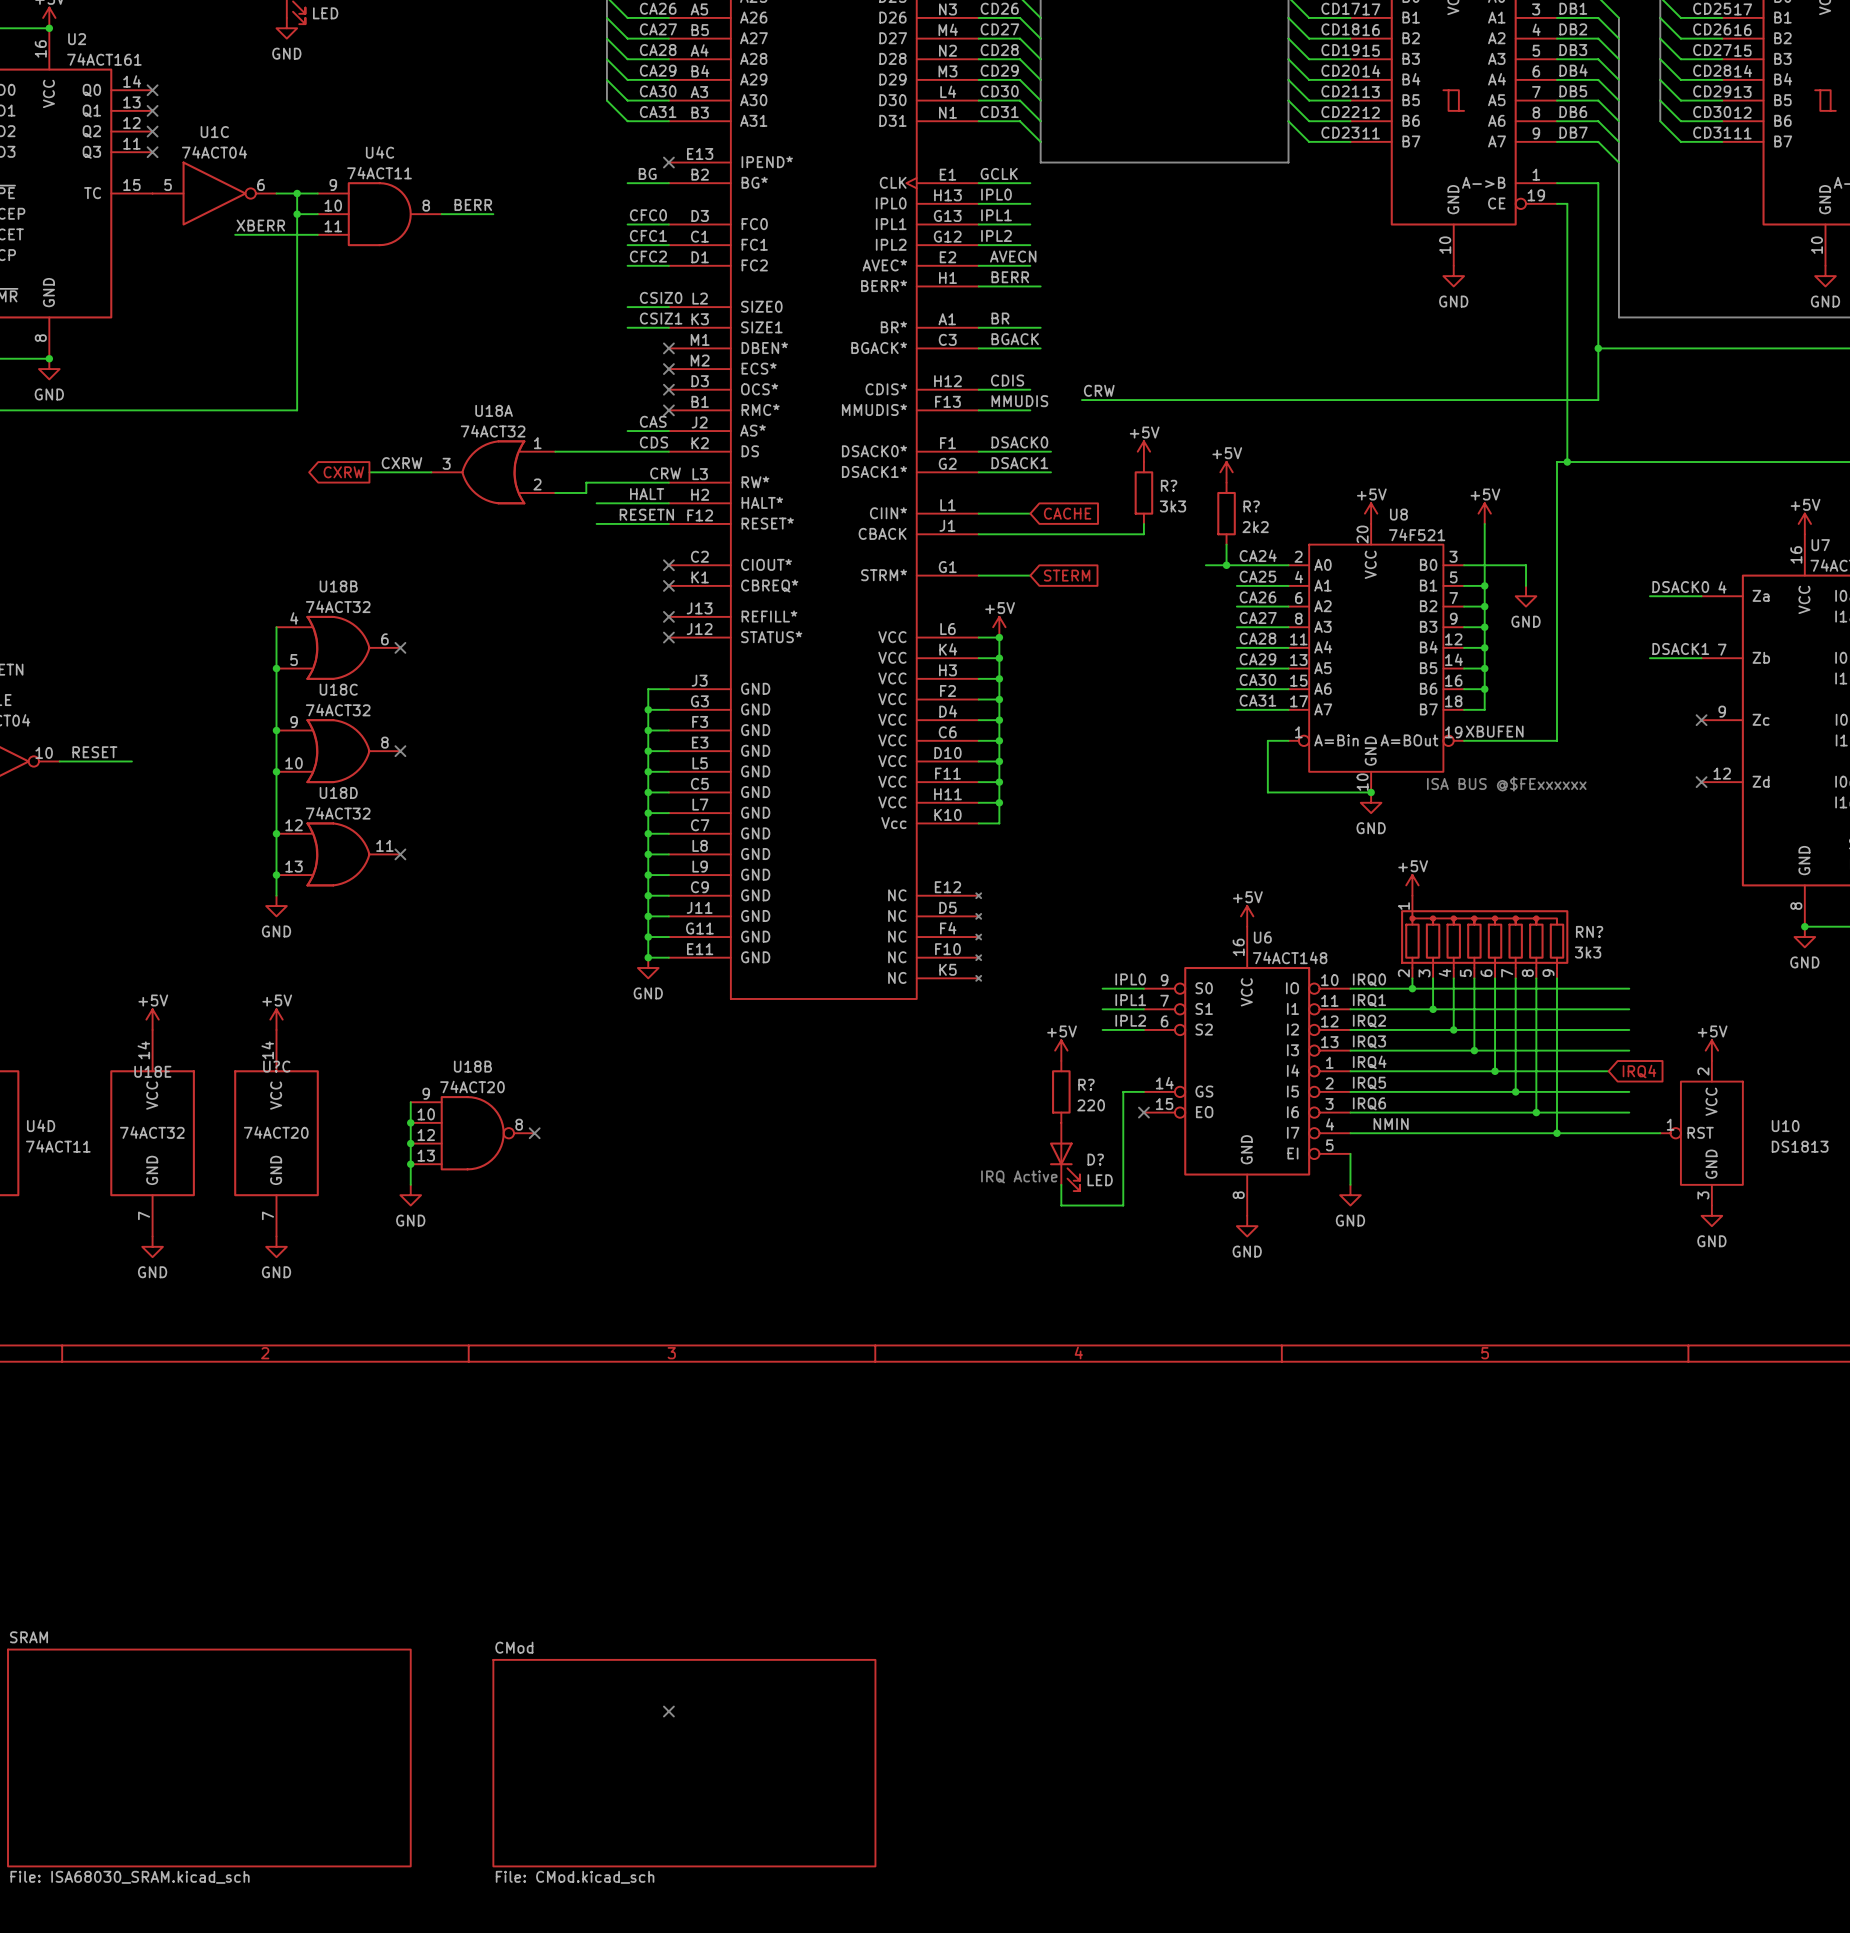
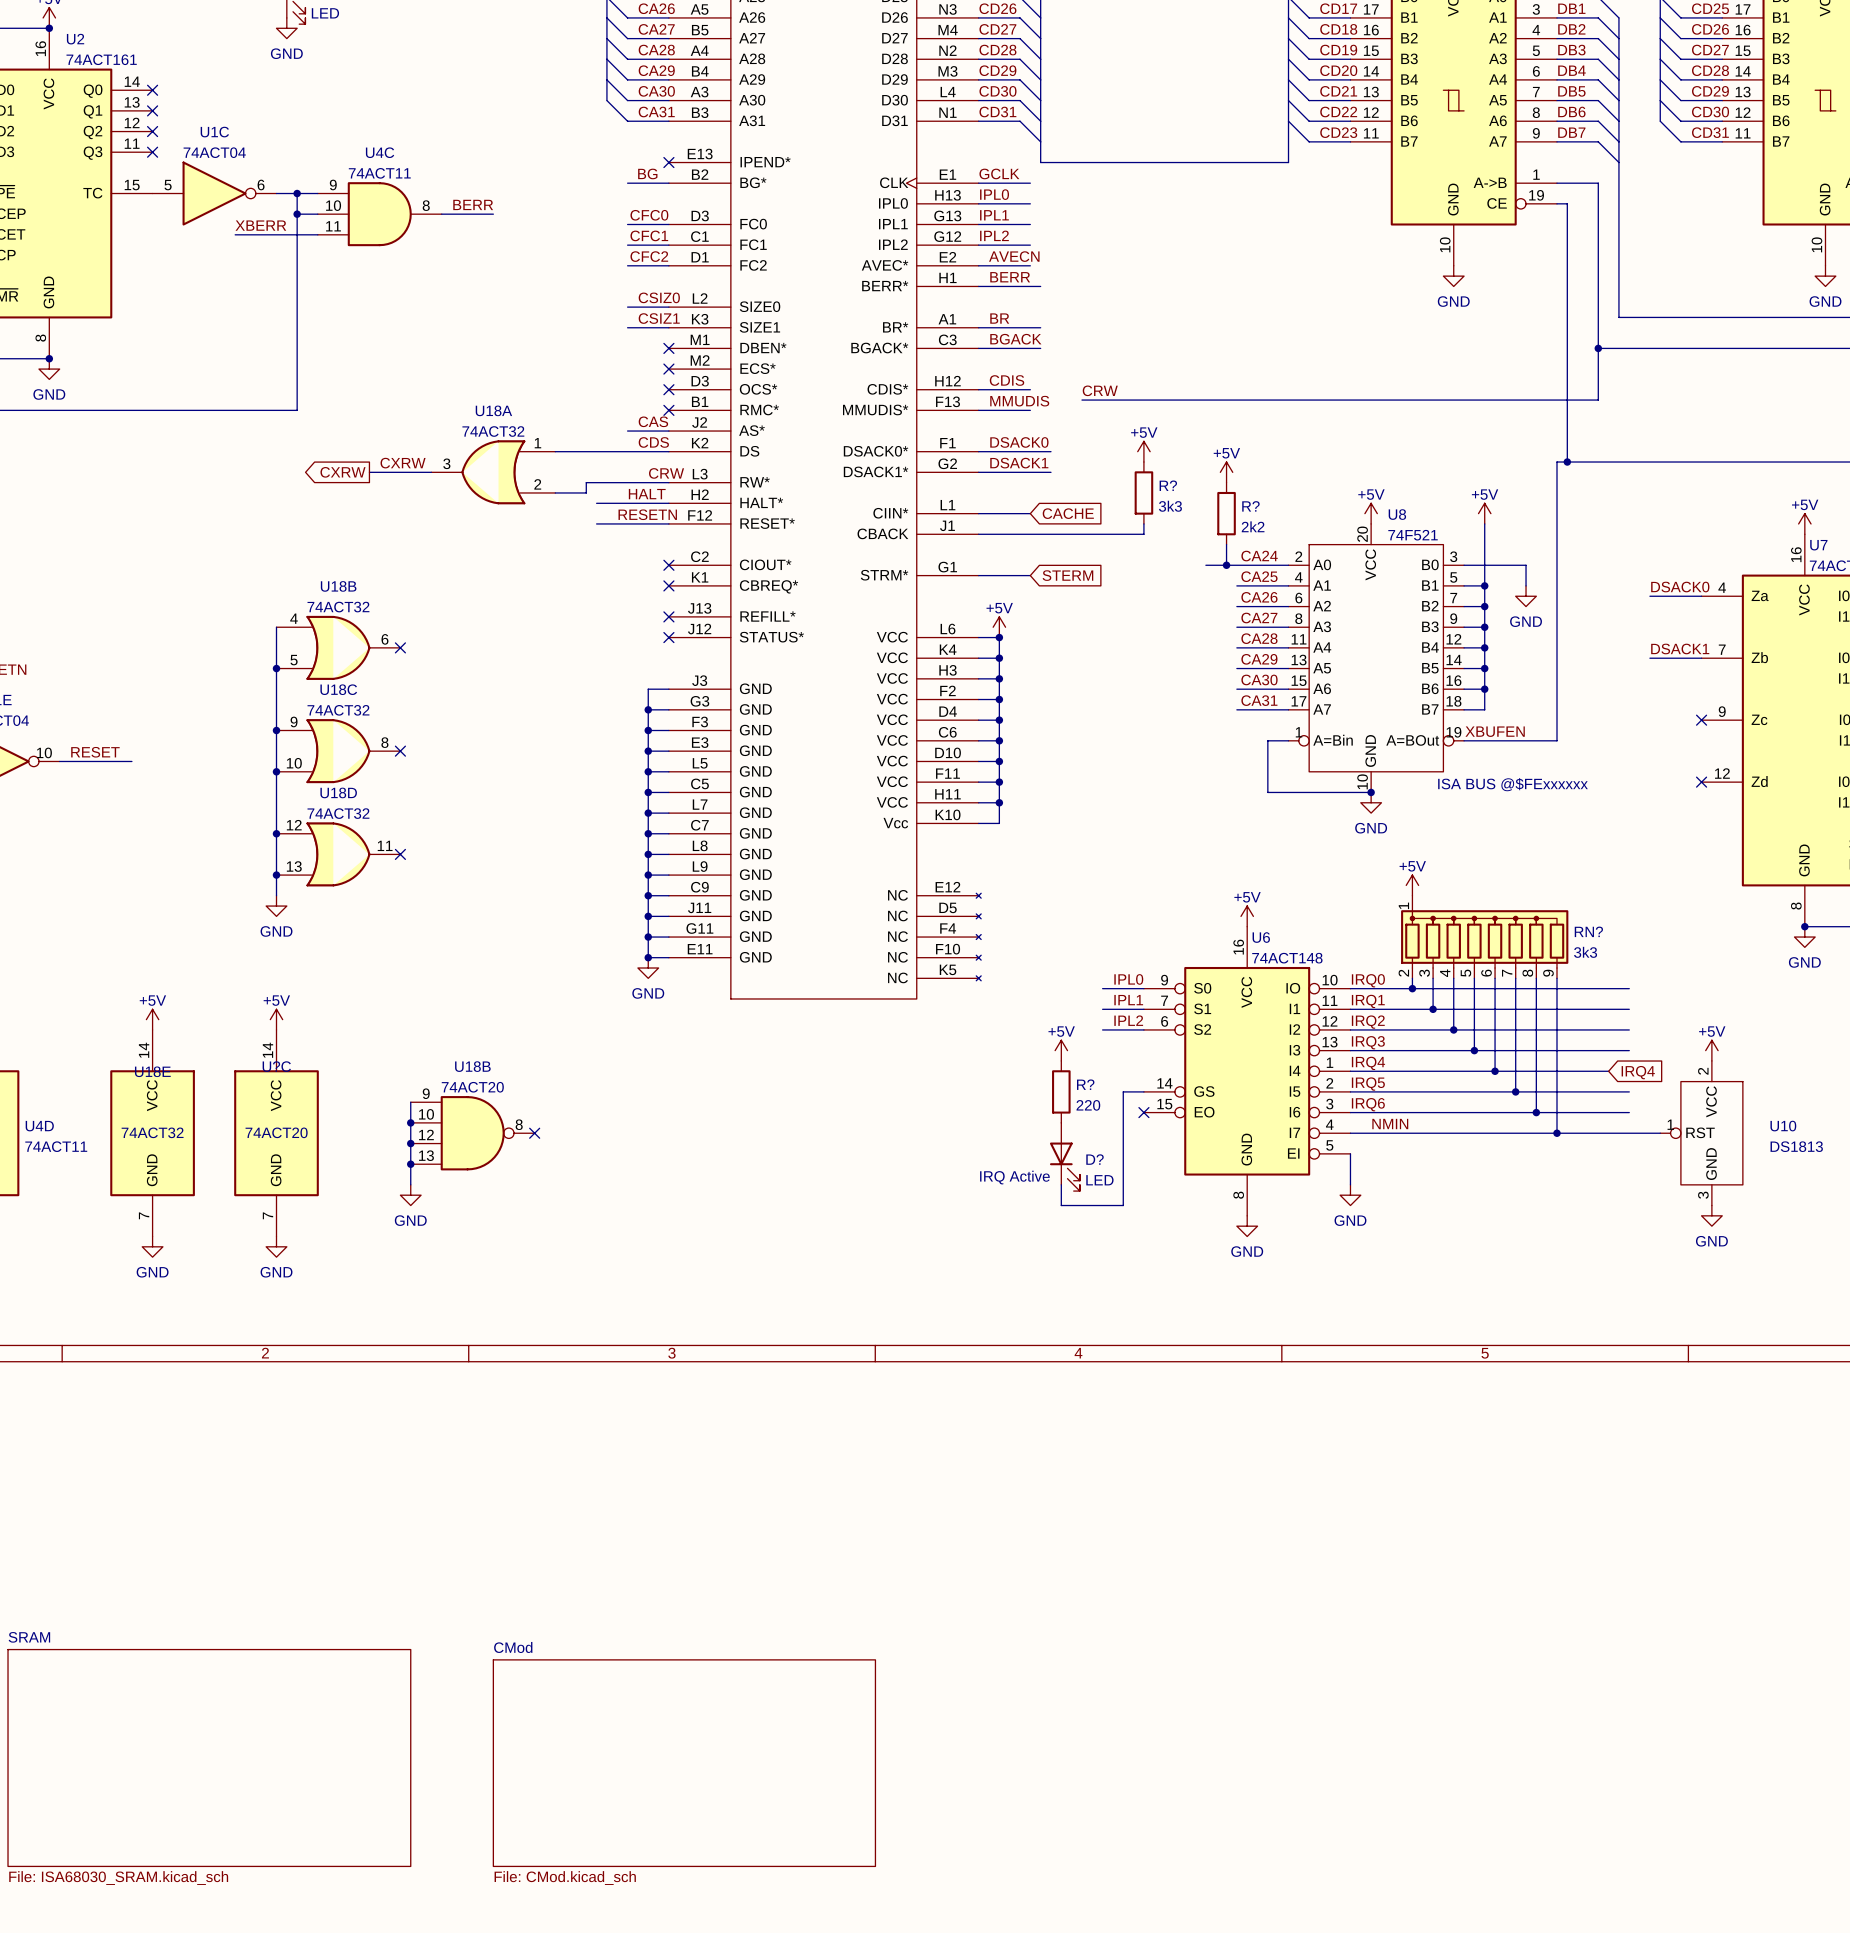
no-connect mark: (668, 1711) -> none

